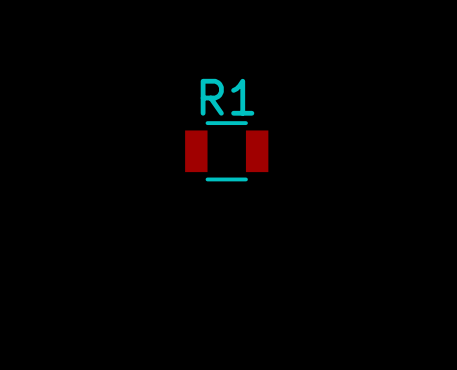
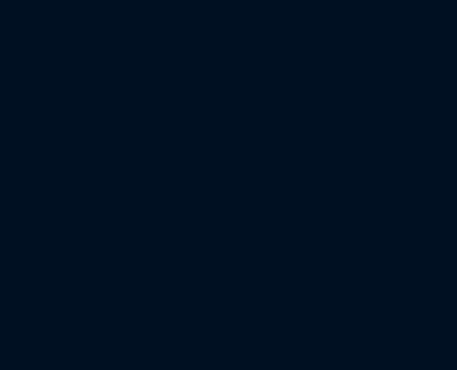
R1: (226, 151) -> none

